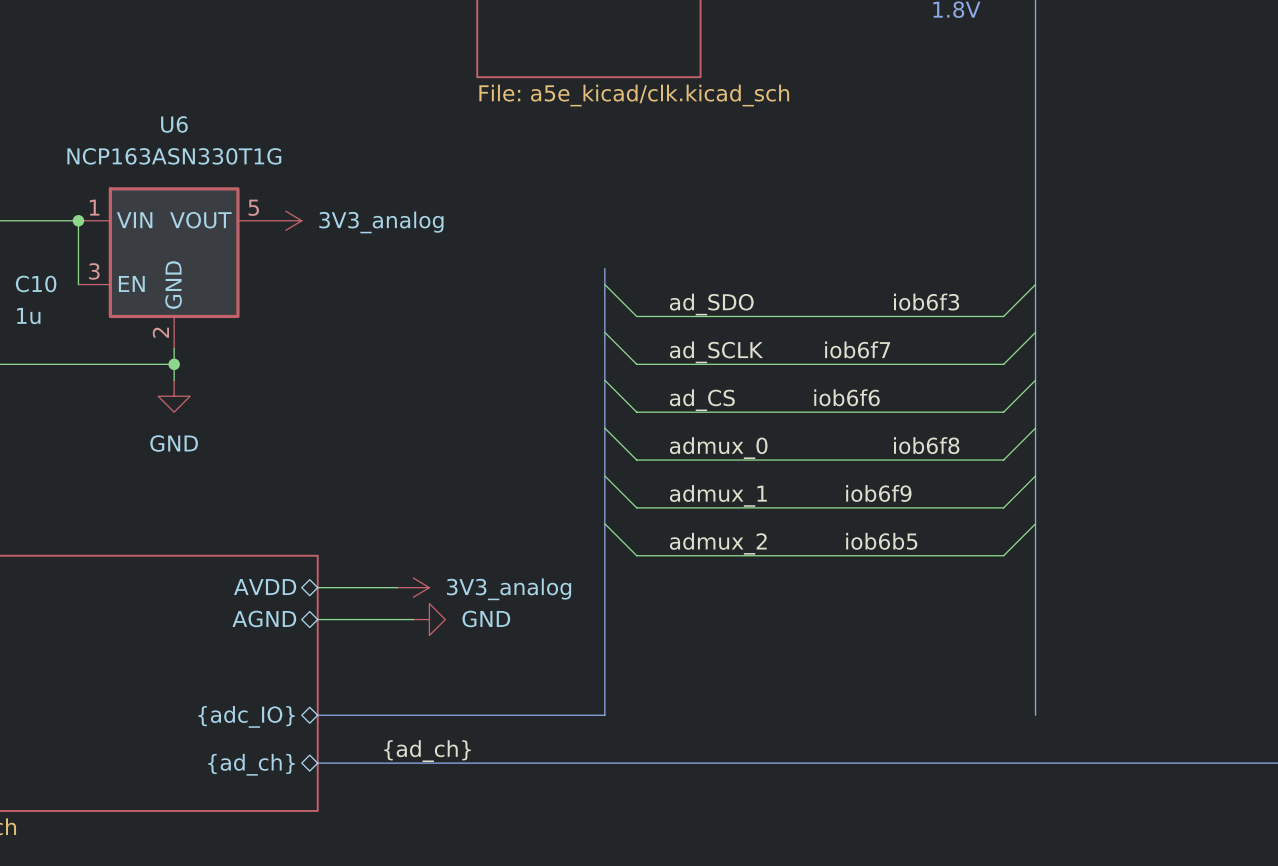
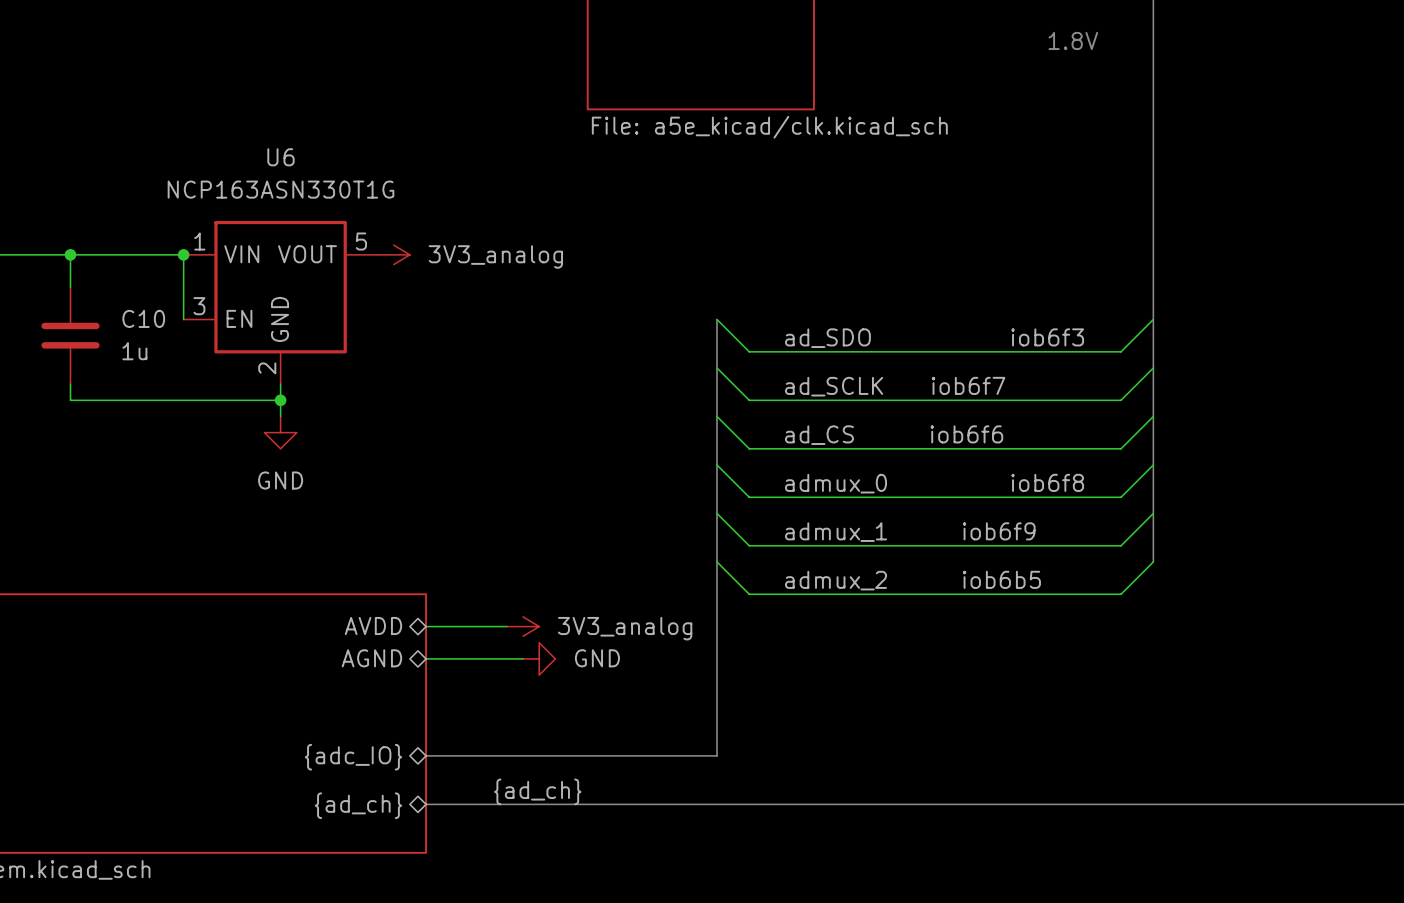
bus: (604, 268) (604, 284) -> none
bus: (1035, 523) (1035, 715) -> none

